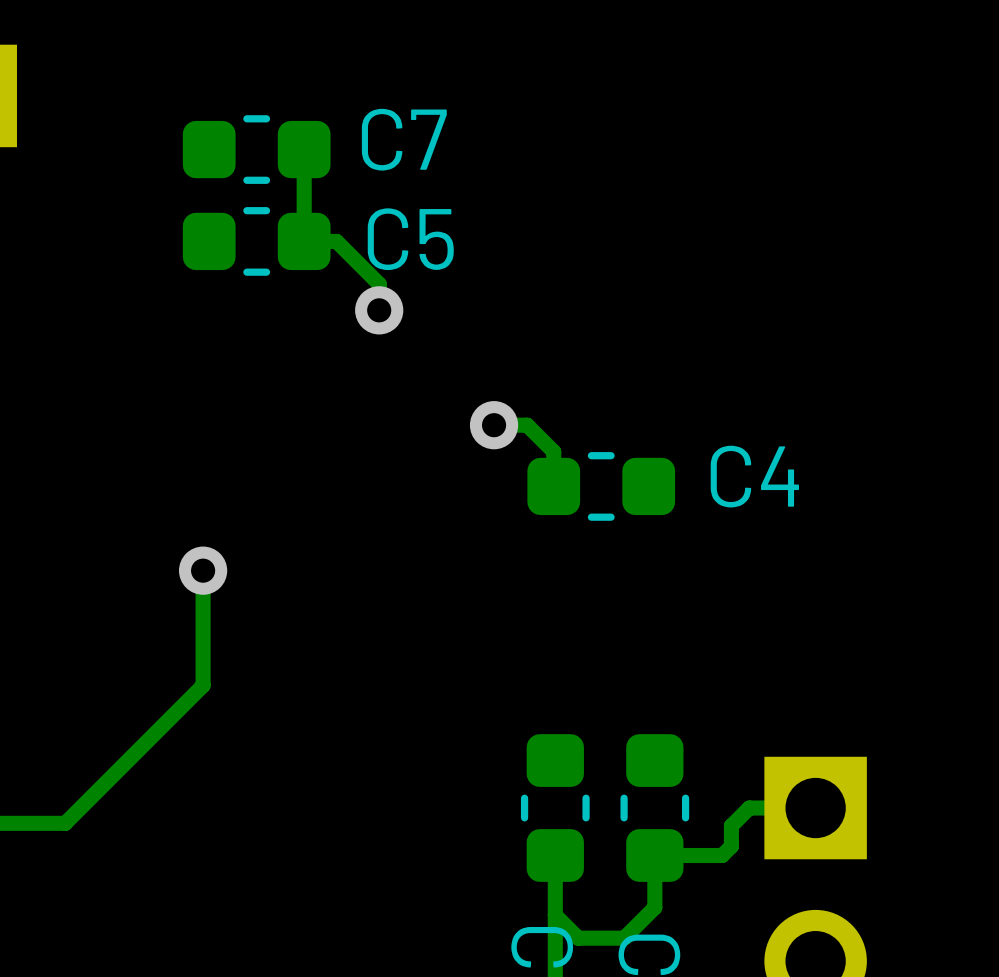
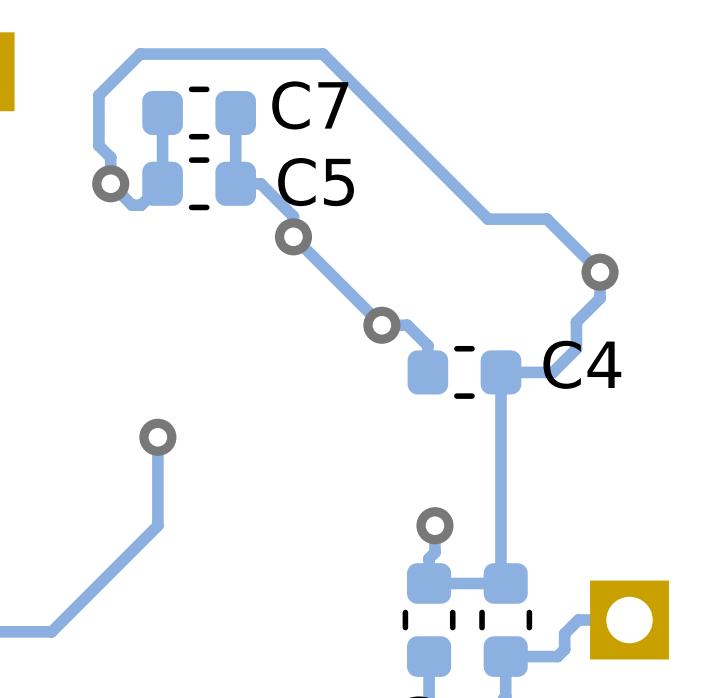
track: none -> (162, 113) (162, 183) (141, 205) (132, 205) (110, 183) (110, 157) (98, 145) (98, 95) (140, 54) (322, 54) (488, 219) (546, 219) (600, 272) (600, 298) (576, 322) (576, 348) (552, 372) (500, 372) (500, 578) (505, 583) (429, 583) (429, 558) (434, 552) (434, 525)
via: none -> (110, 183)
track: none -> (293, 236) (381, 325)
via: none -> (600, 272)
via: none -> (434, 525)

